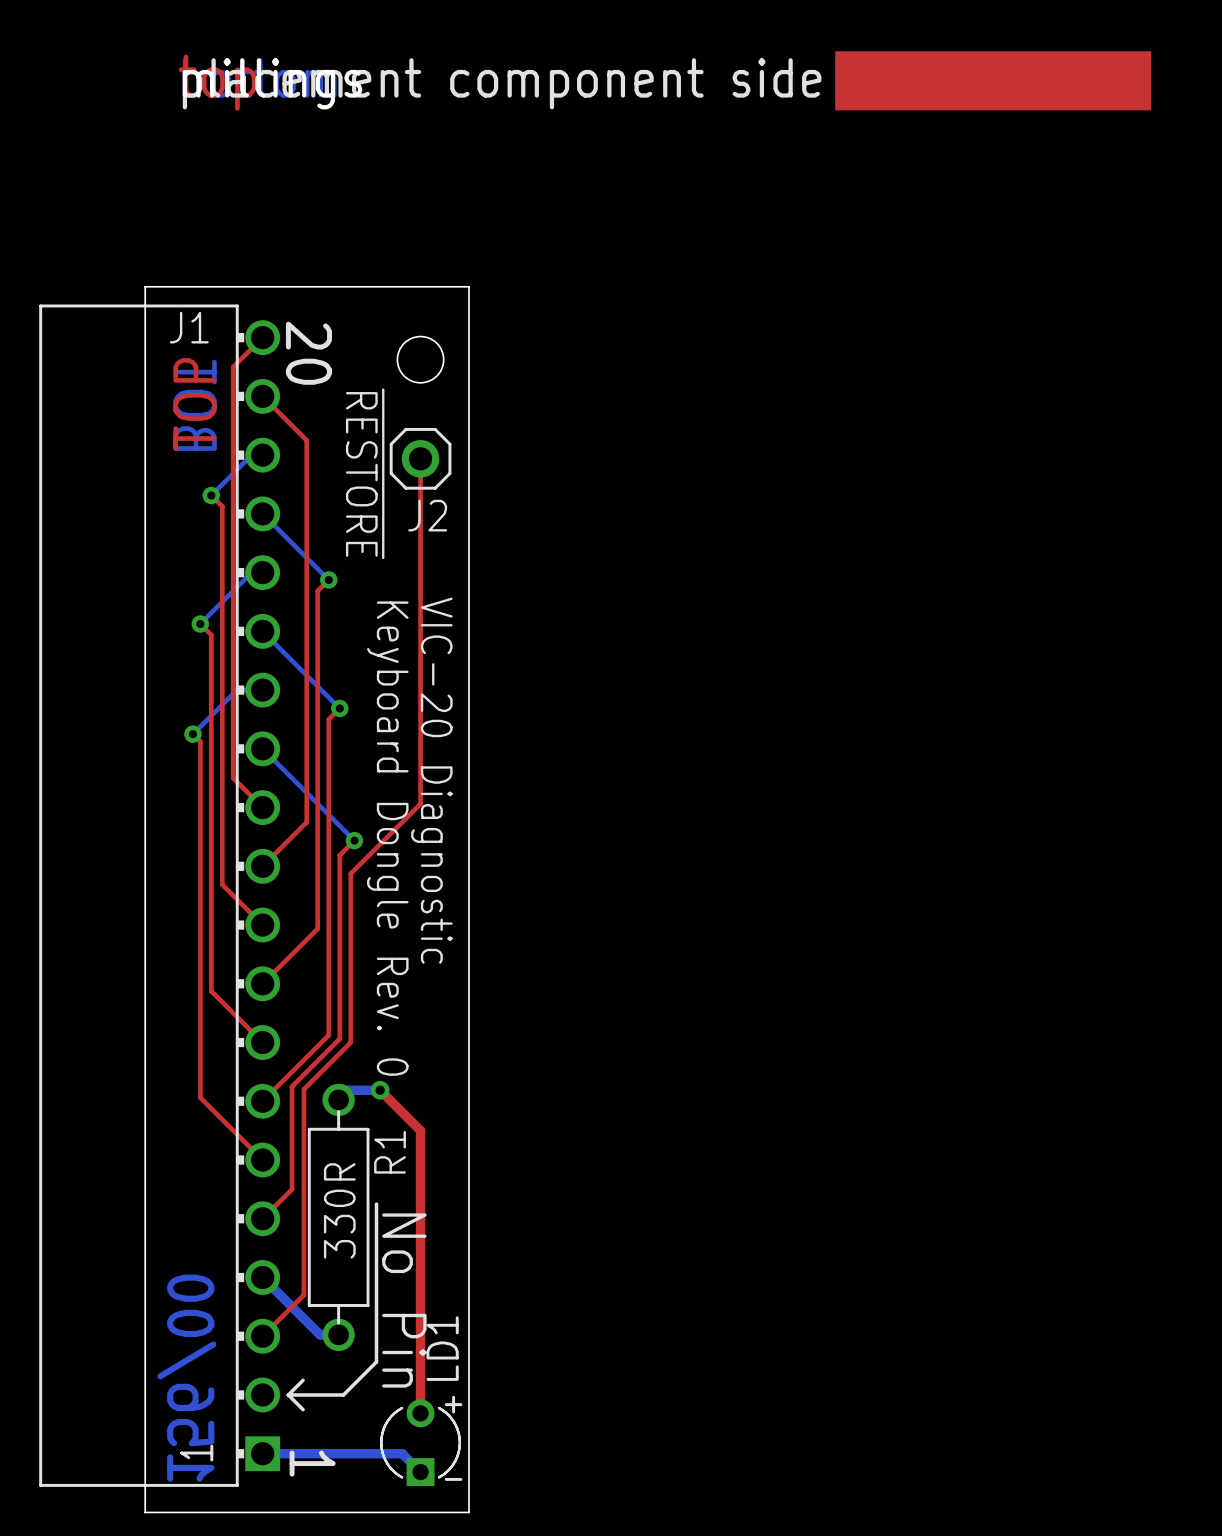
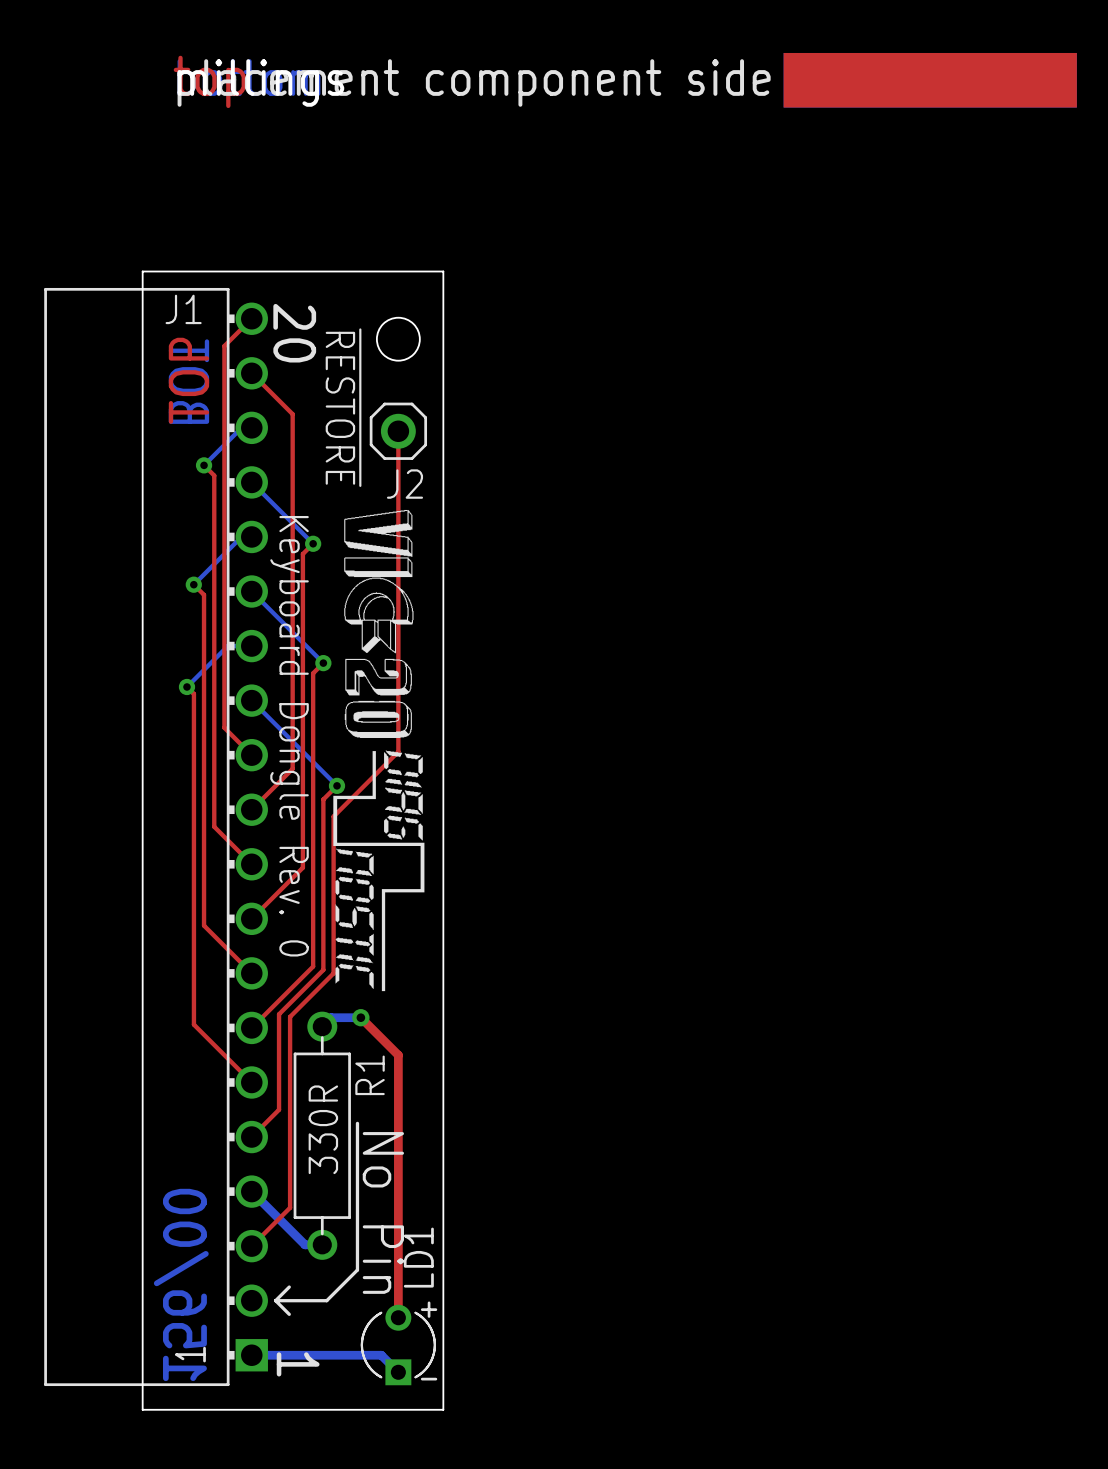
text position: ~{RESTORE} (365, 473) -> ~{RESTORE} (343, 407)
drawing: none -> [333, 509, 425, 992]
text: VIC-20 Diagnostic (431, 780) -> none
text position: Keyboard Dongle Rev. 0 (387, 838) -> Keyboard Dongle Rev. 0 (289, 736)

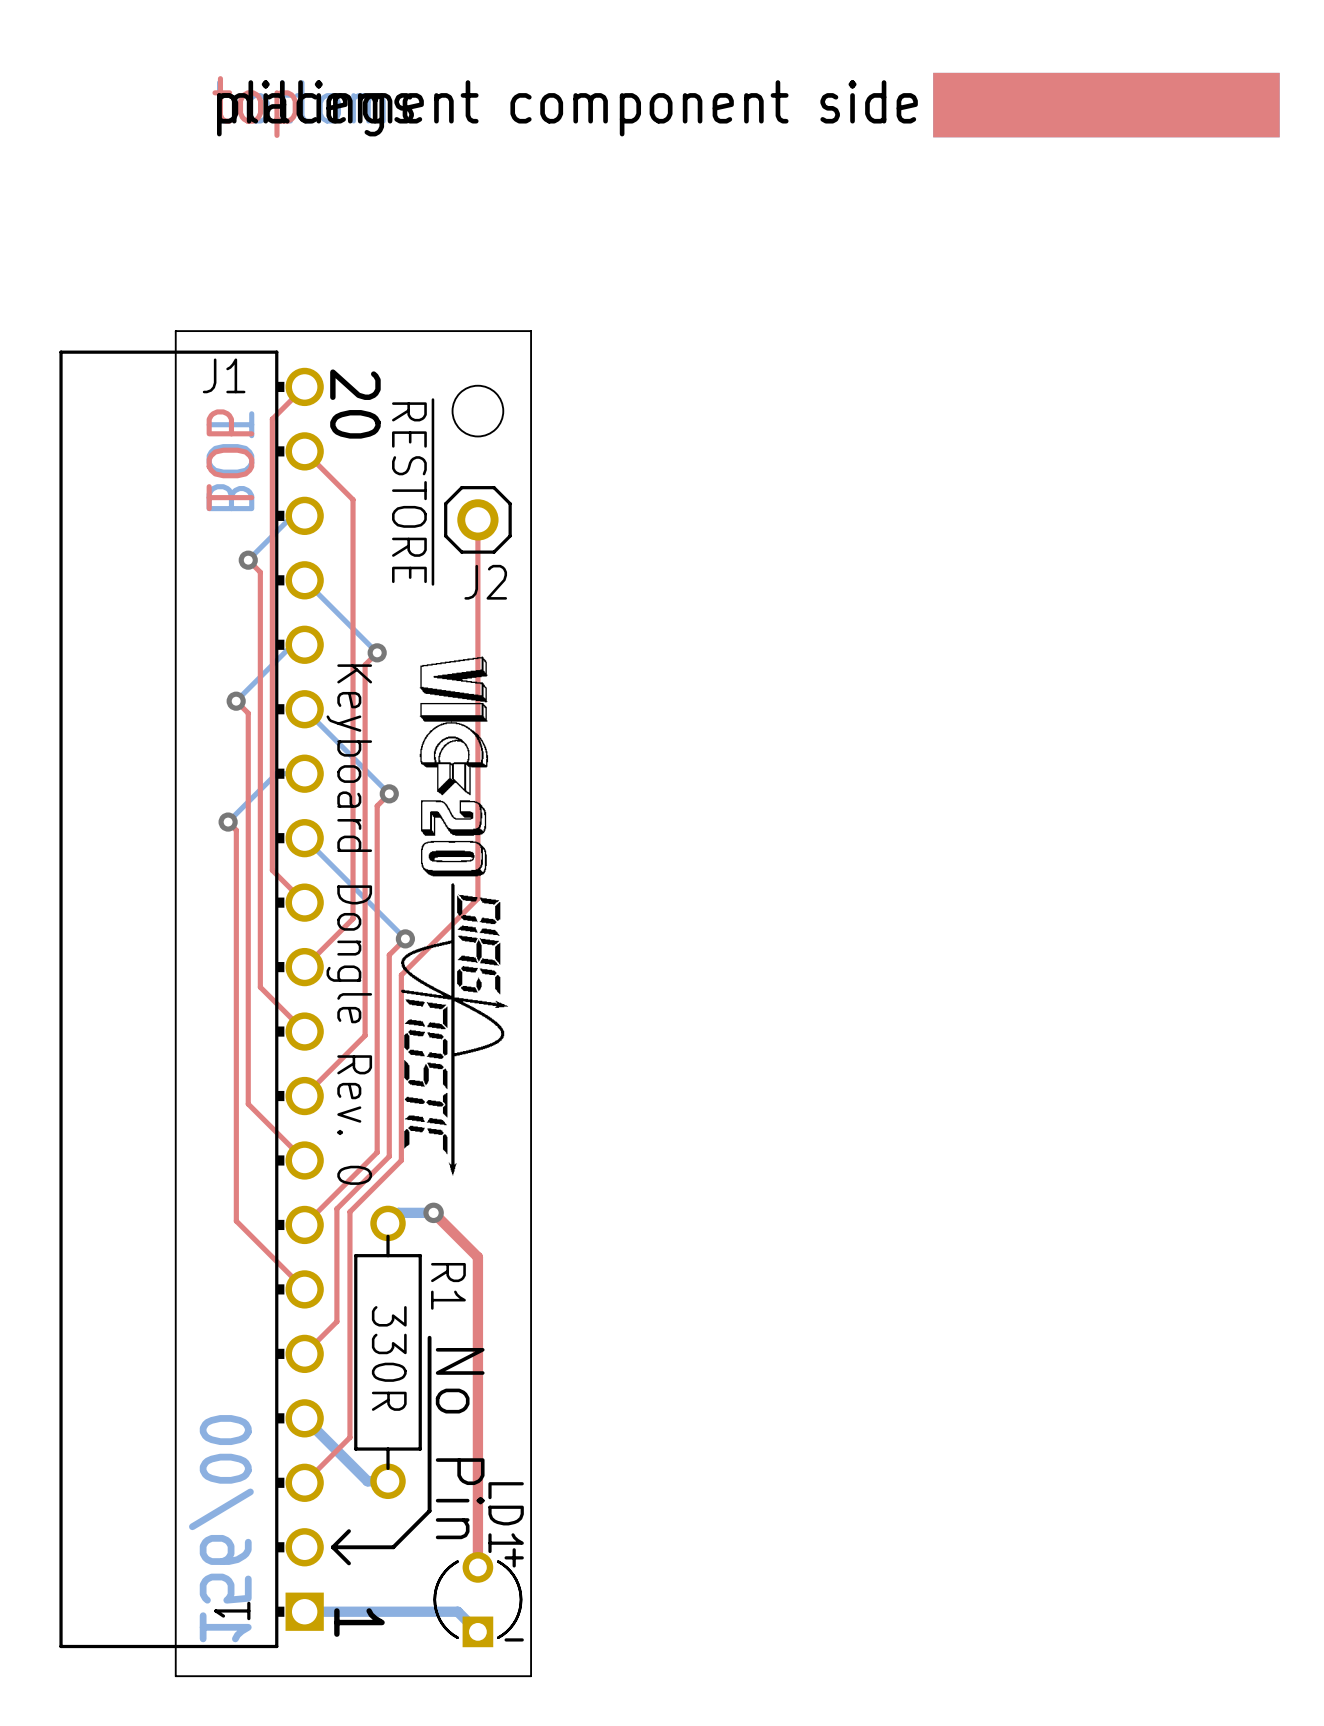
drawing shape: [333, 509, 425, 992] -> [401, 656, 509, 1176]
text position: Keyboard Dongle Rev. 0 (289, 736) -> Keyboard Dongle Rev. 0 (349, 924)
R1 name rotation: 0° (370, 1075) -> 180° (448, 1286)
text rotation: 0° (323, 1129) -> 180° (389, 1358)
LD1 name rotation: 0° (418, 1257) -> 180° (506, 1517)

